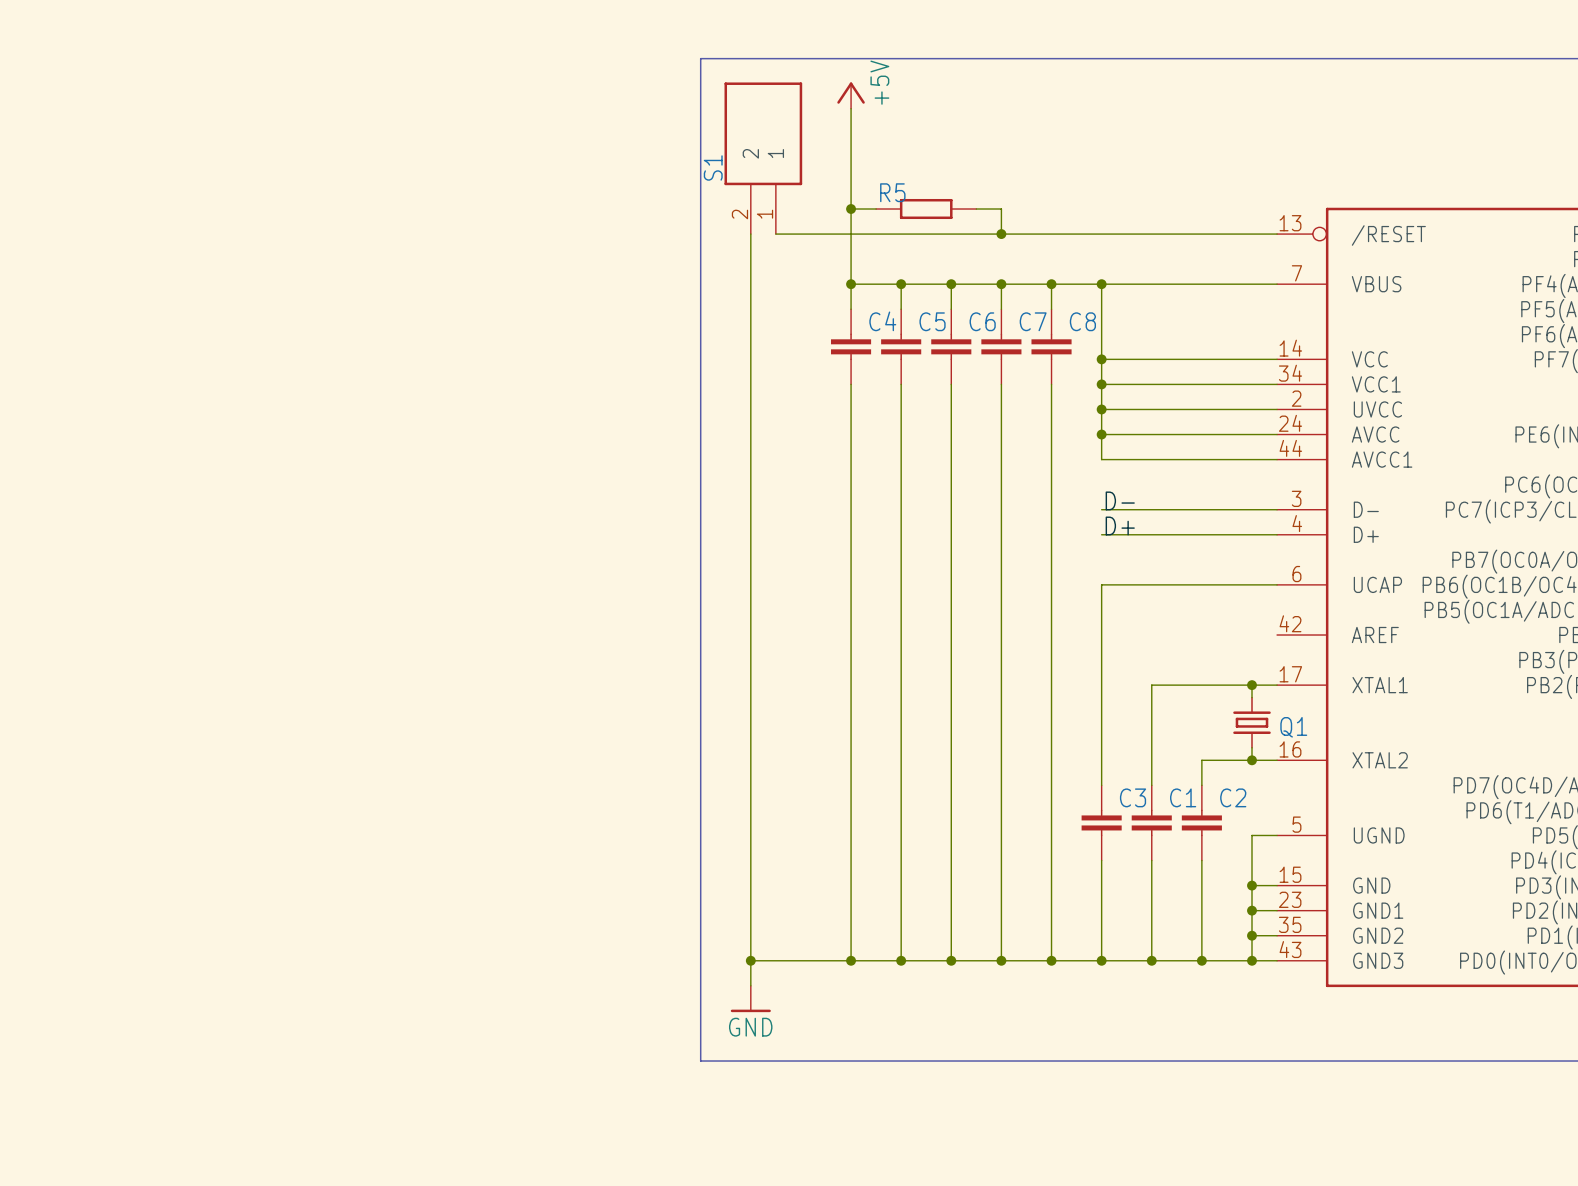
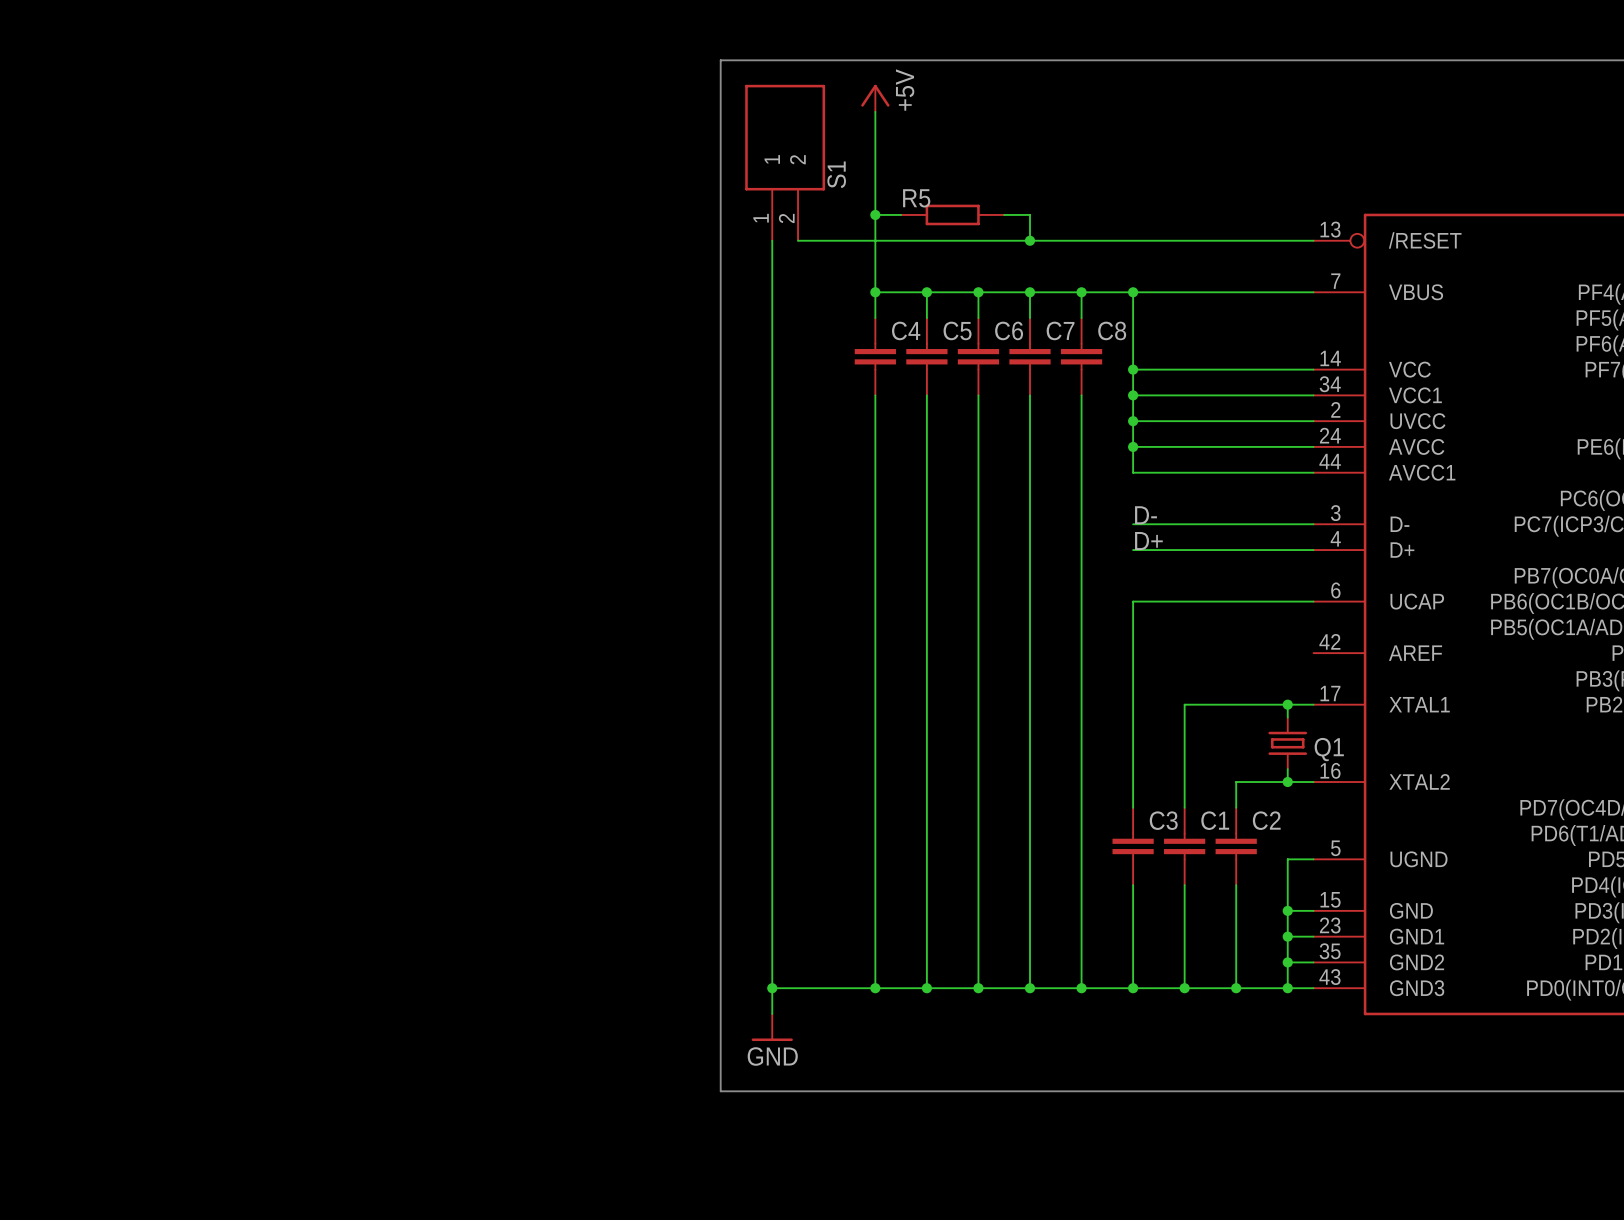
S1 flip: as is (763, 133) -> left-right (785, 137)

